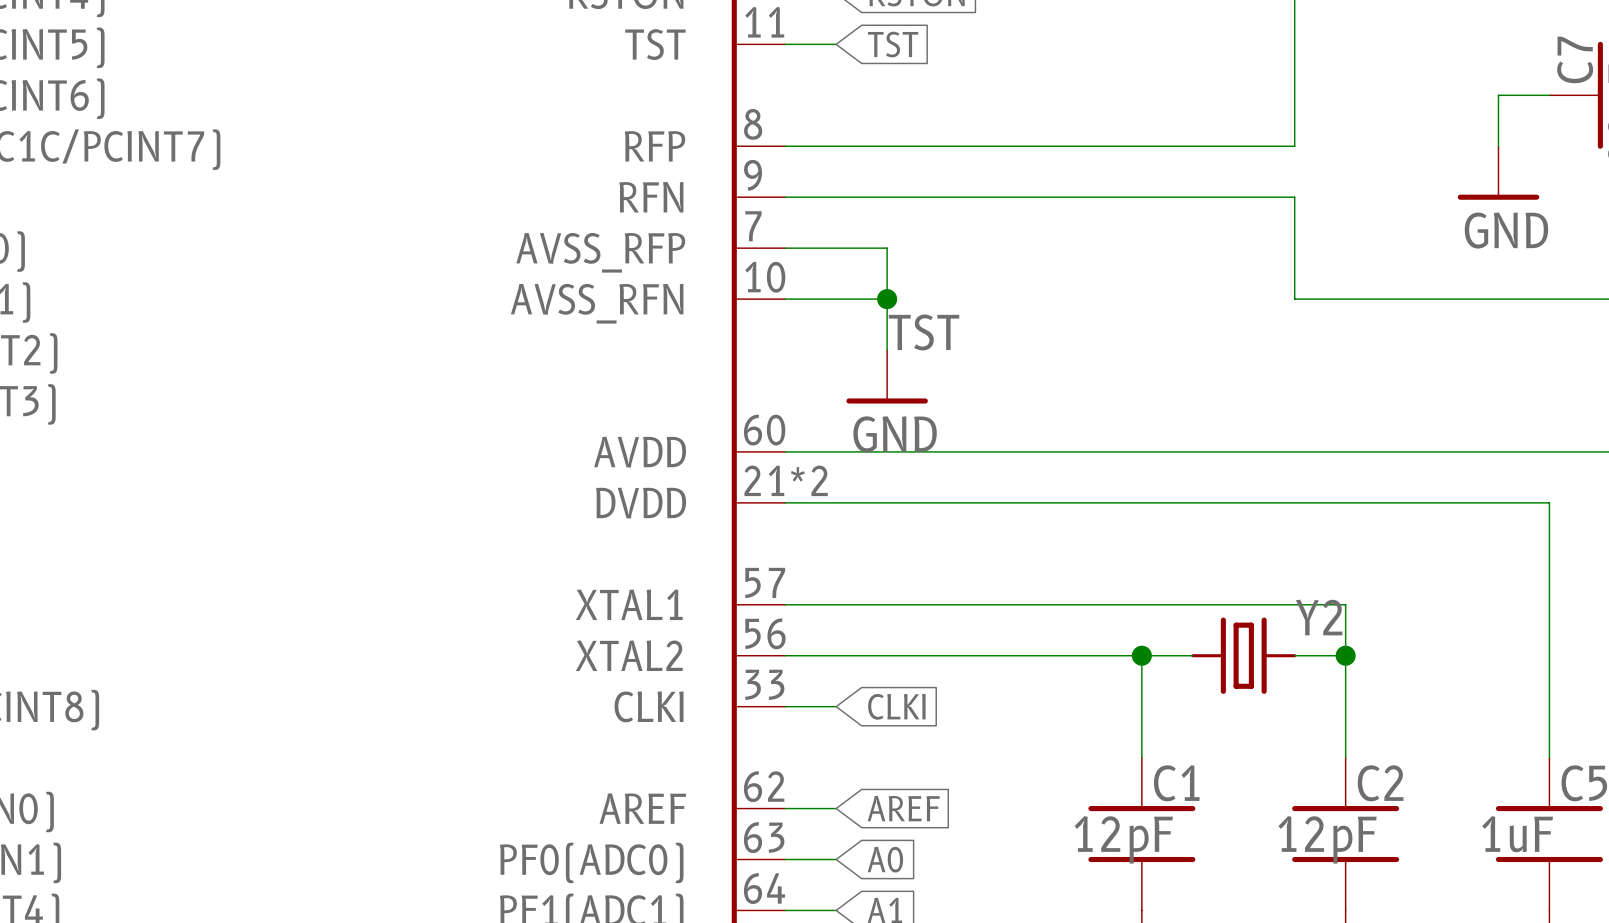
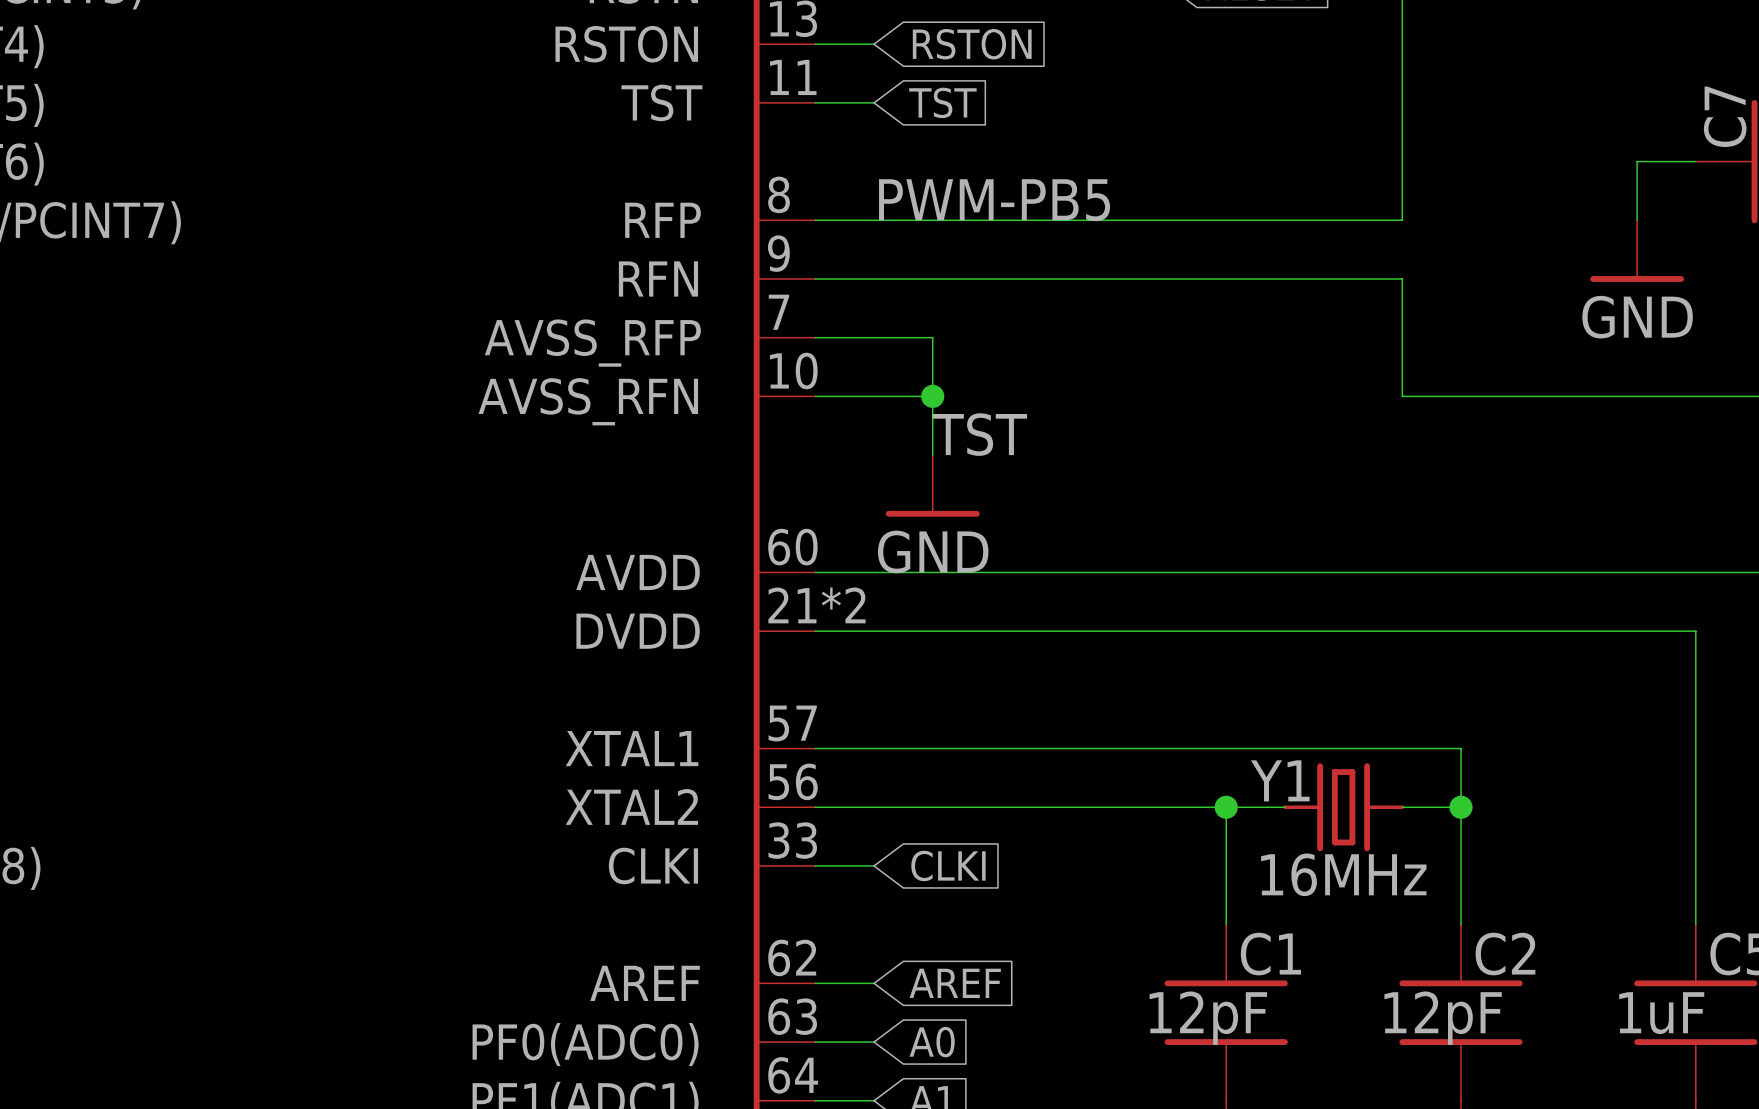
label: none -> PWM-PB5 (994, 200)
Y2 name: Y2 (1319, 617) -> Y1 (1280, 780)
Y2 value: none -> 16MHz (1343, 874)

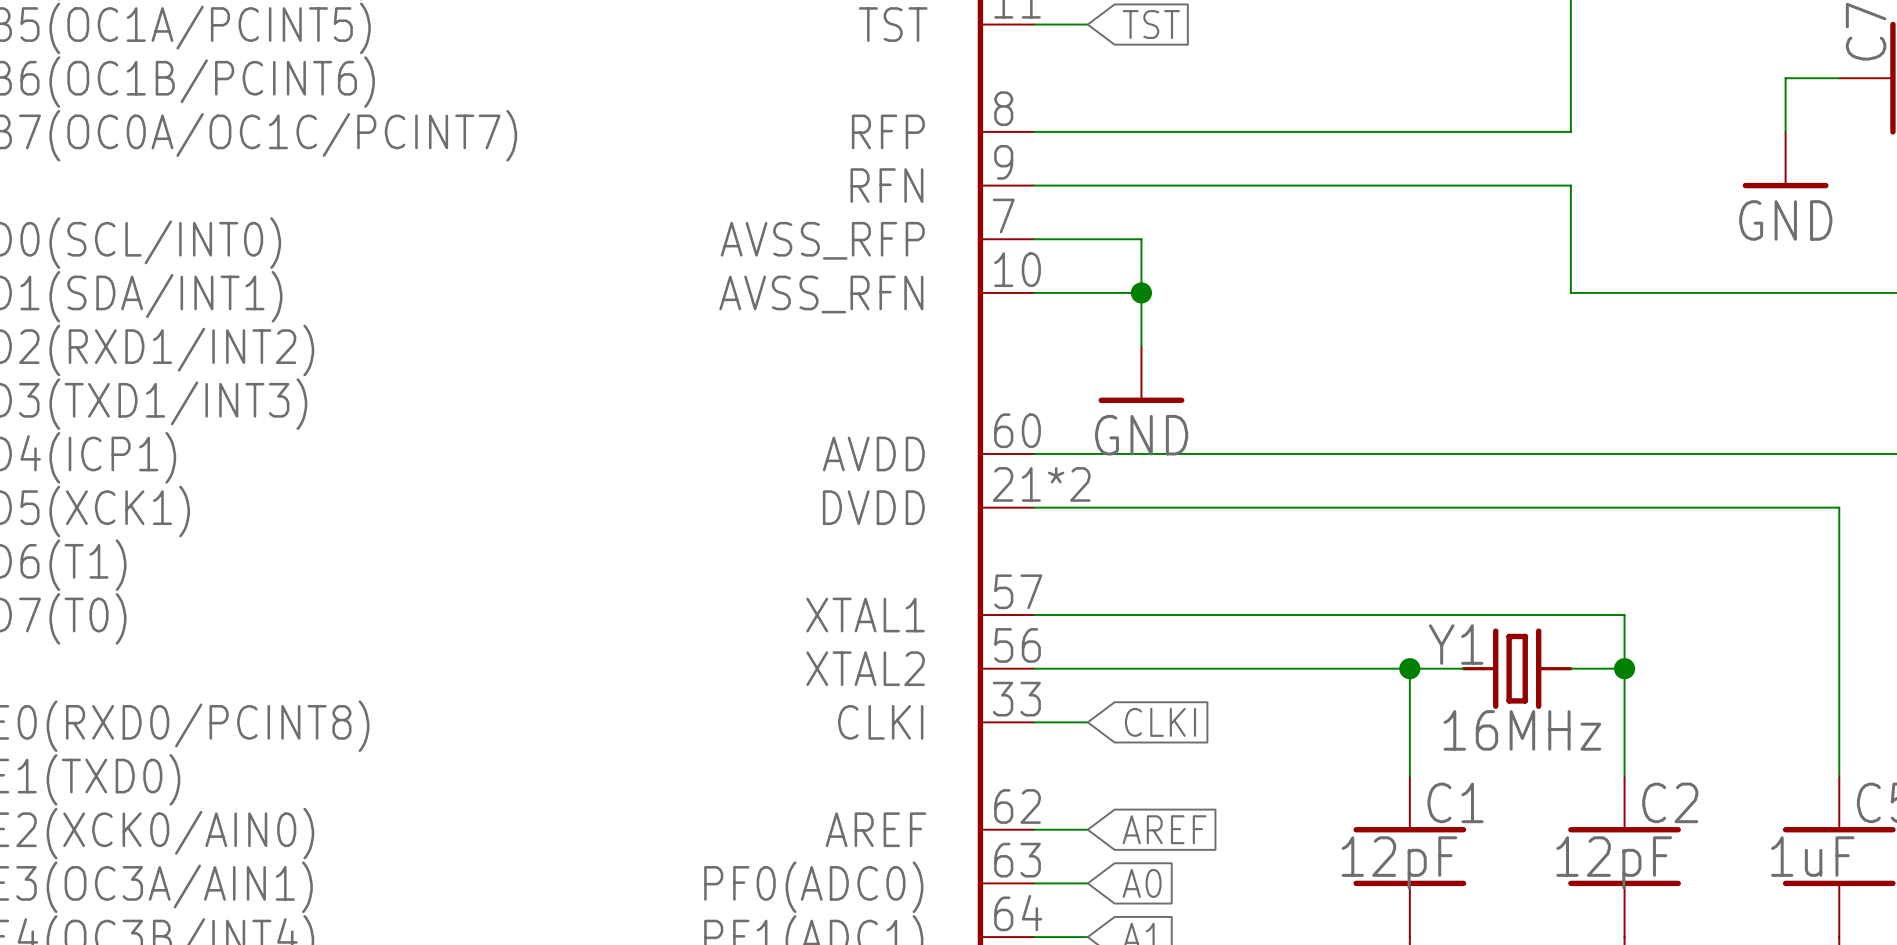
label: PWM-PB5 (994, 200) -> none
label: TST (979, 434) -> none

